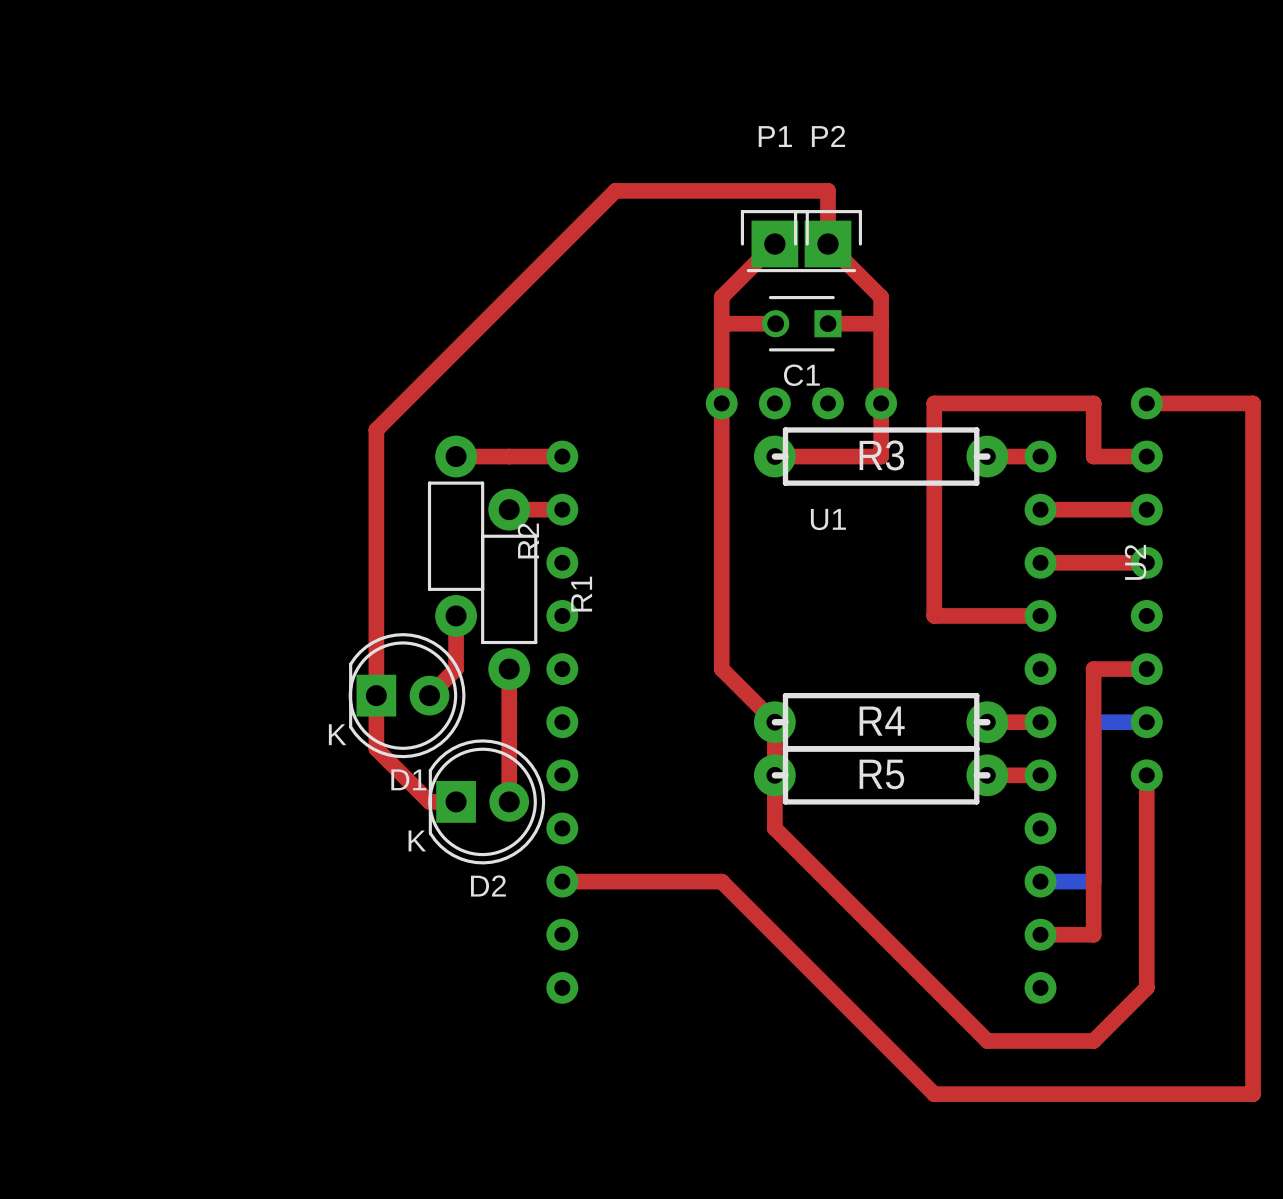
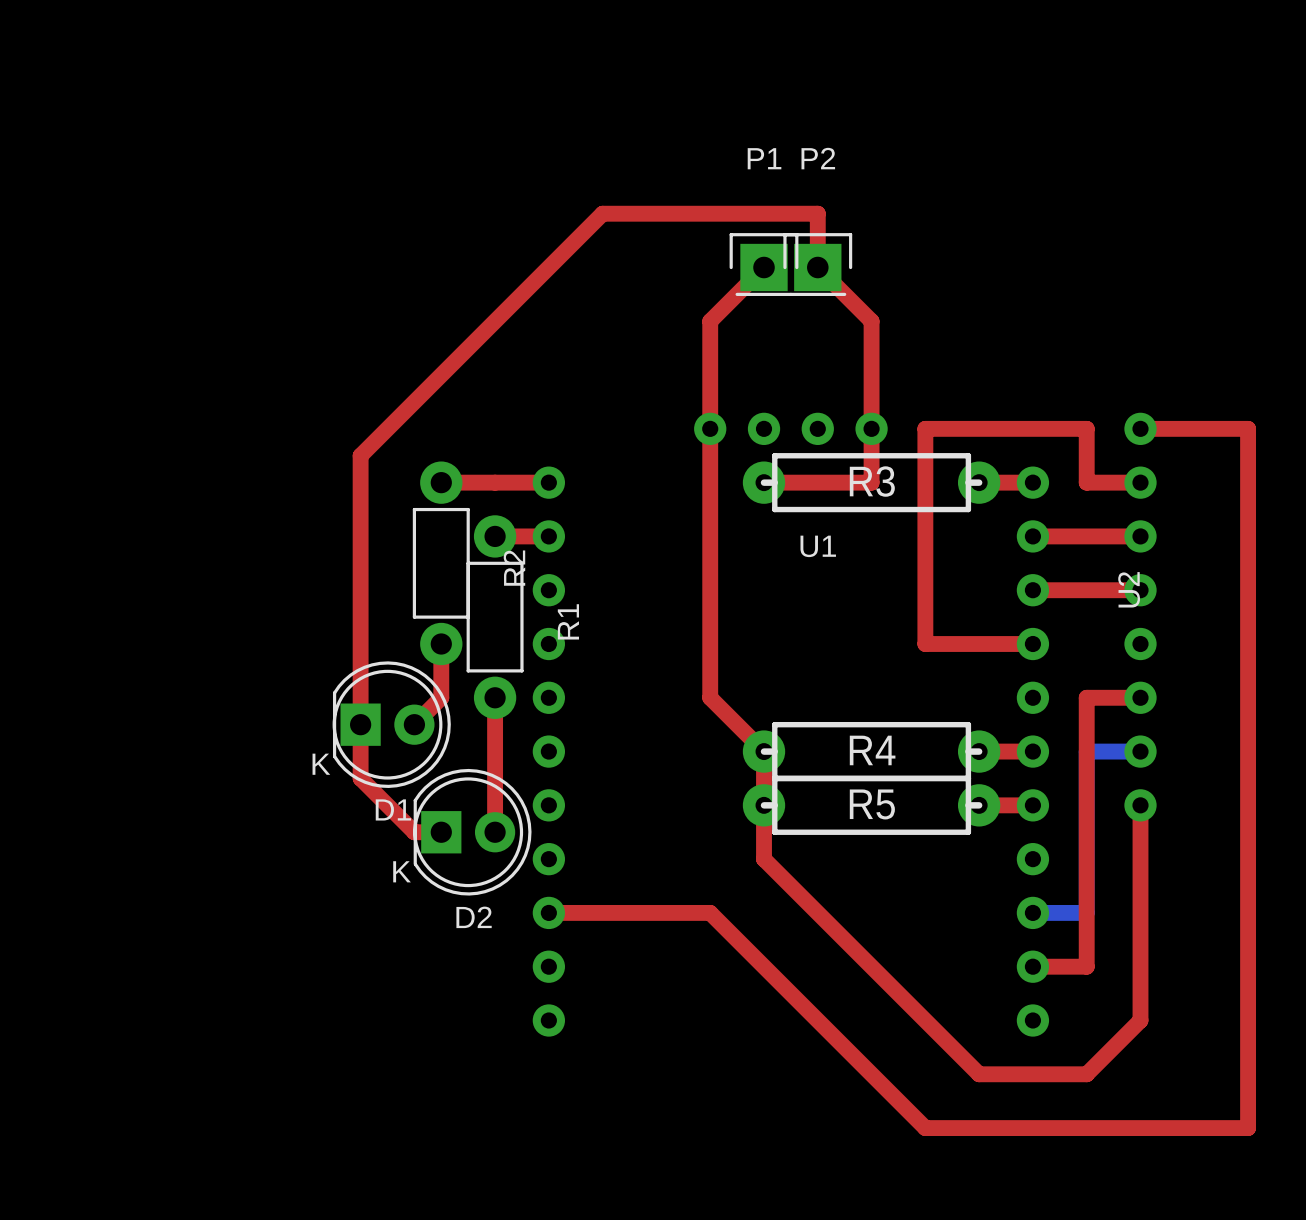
top track: (721, 323) (775, 323) -> none
C1: (801, 323) -> none
top track: (827, 323) (881, 323) -> none

